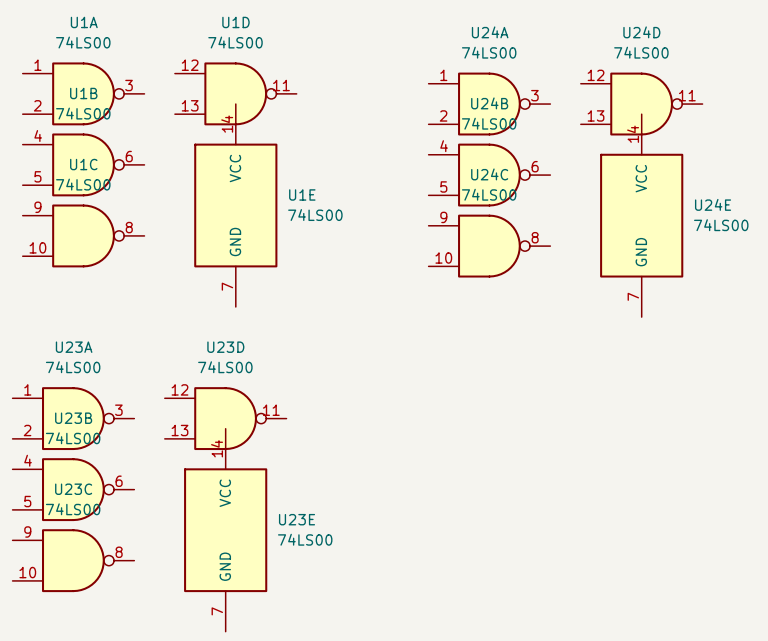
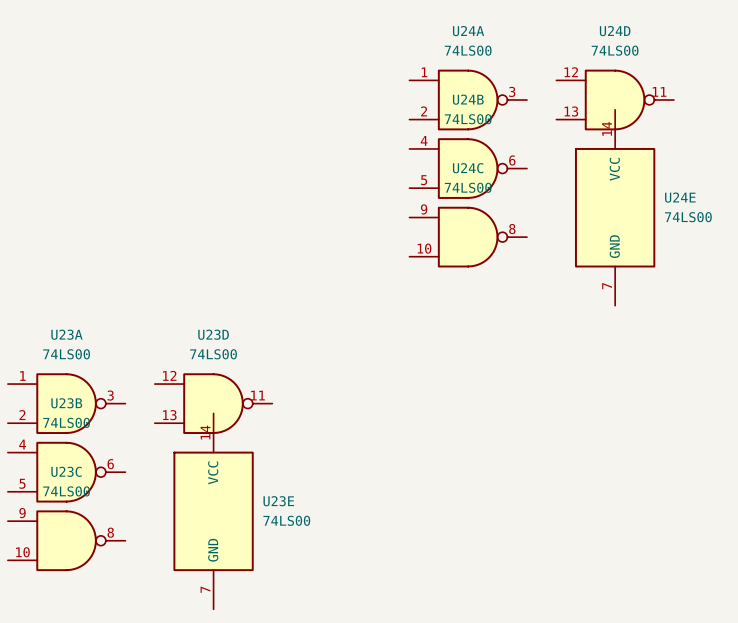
U1A: 74LS00 (83, 93) -> none
U1D: 74LS00 (235, 93) -> none
U1B: 74LS00 (83, 164) -> none
U1E: 74LS00 (235, 205) -> none
U1C: 74LS00 (83, 235) -> none

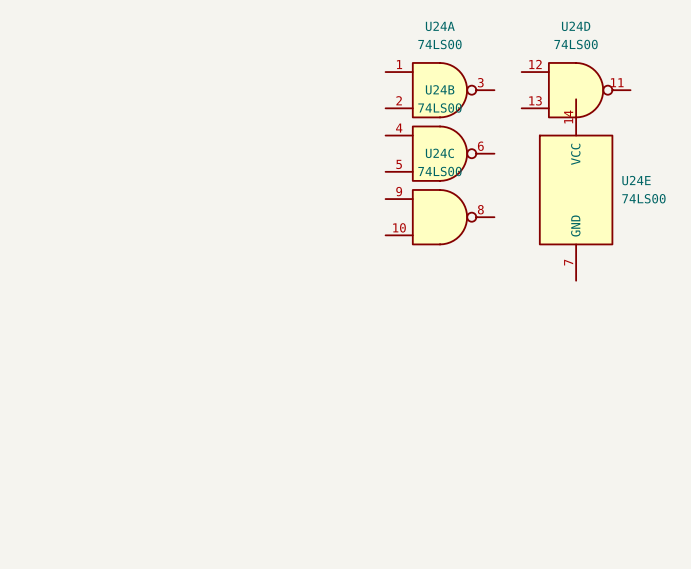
U23A: 74LS00 (66, 403) -> none
U23D: 74LS00 (213, 403) -> none
U23B: 74LS00 (66, 472) -> none
U23E: 74LS00 (213, 511) -> none
U23C: 74LS00 (66, 540) -> none

